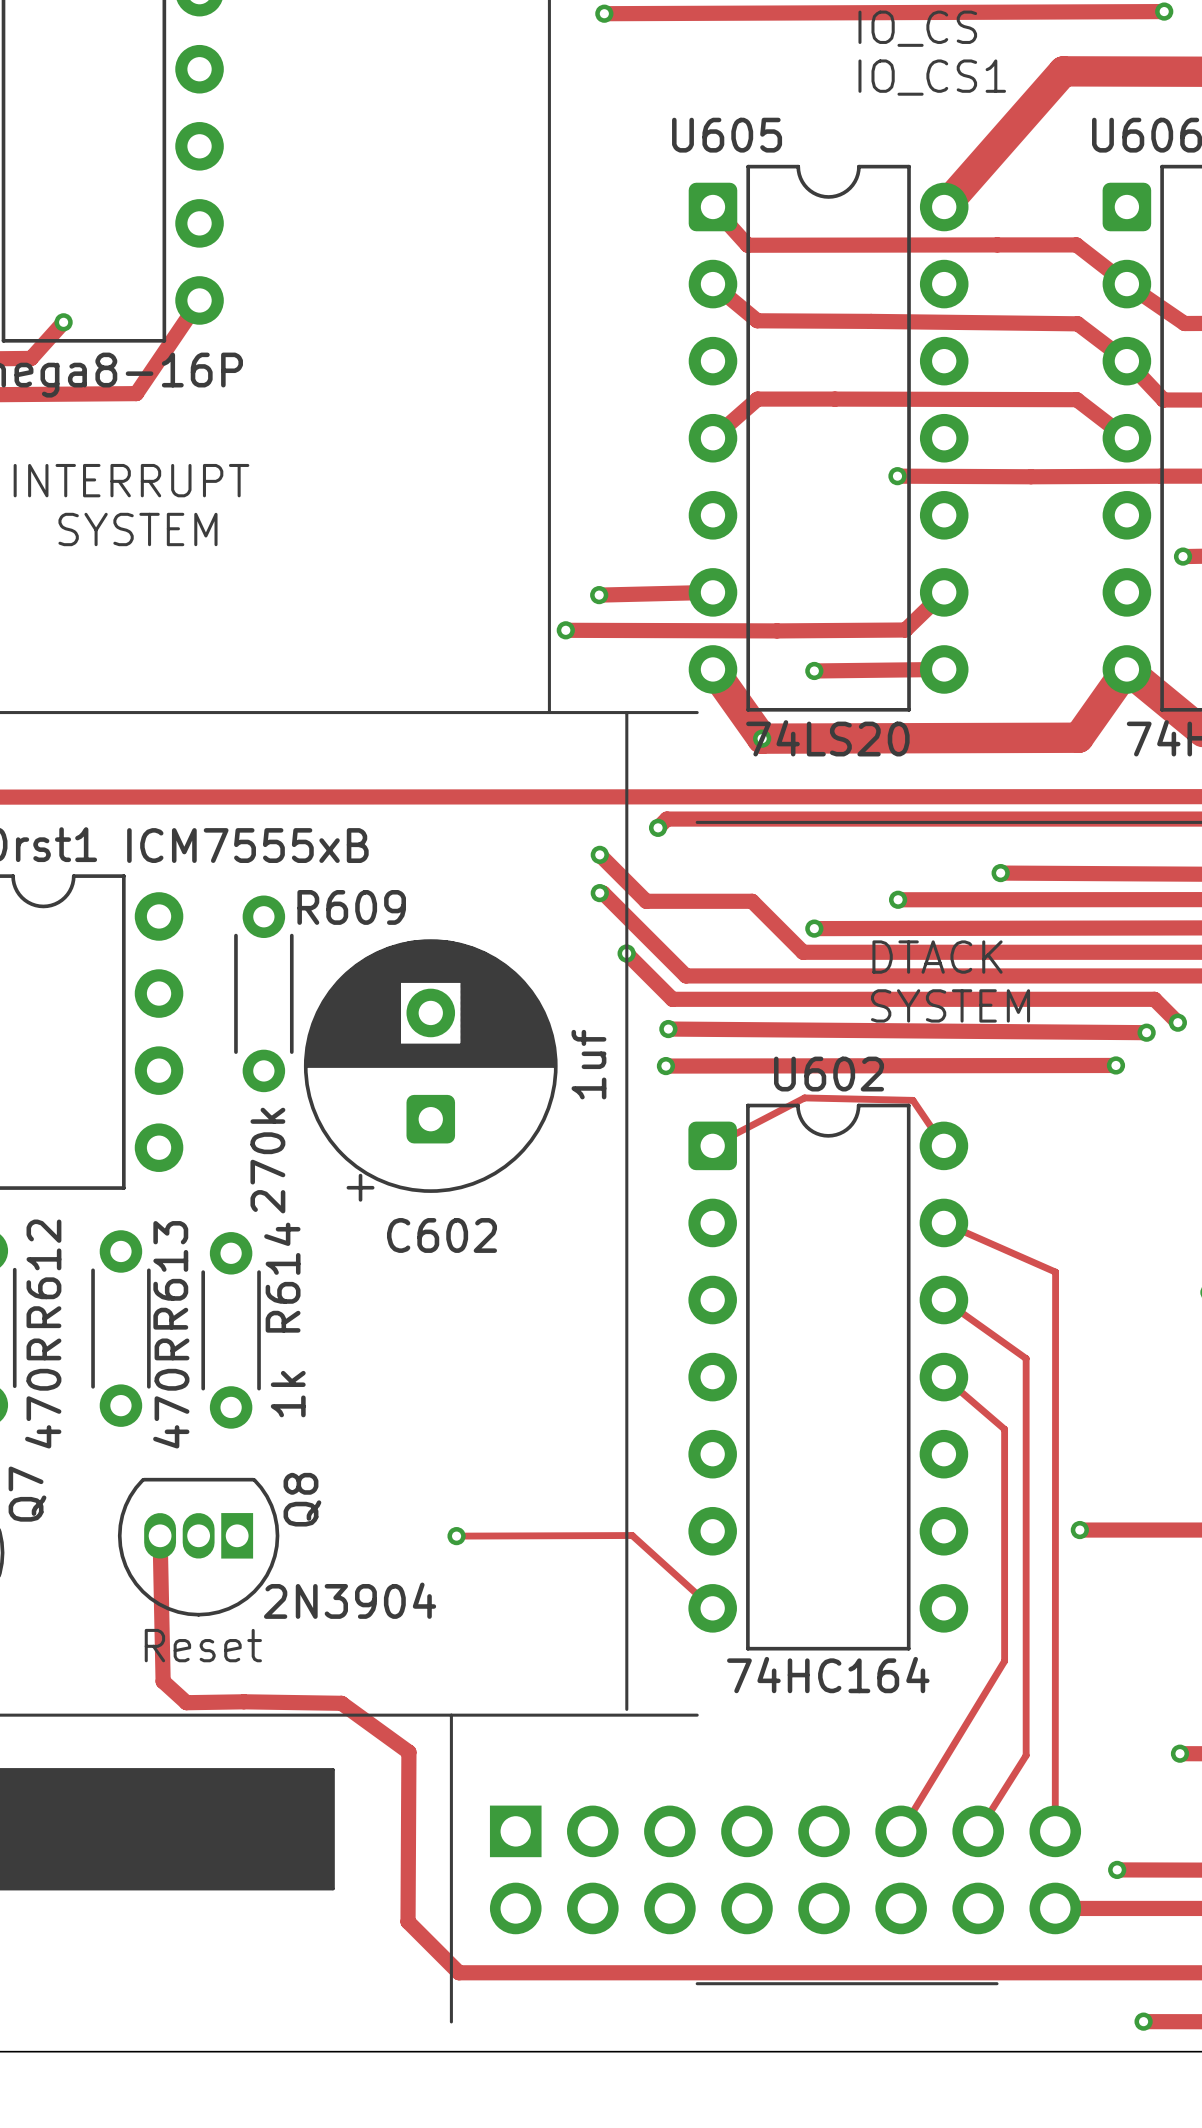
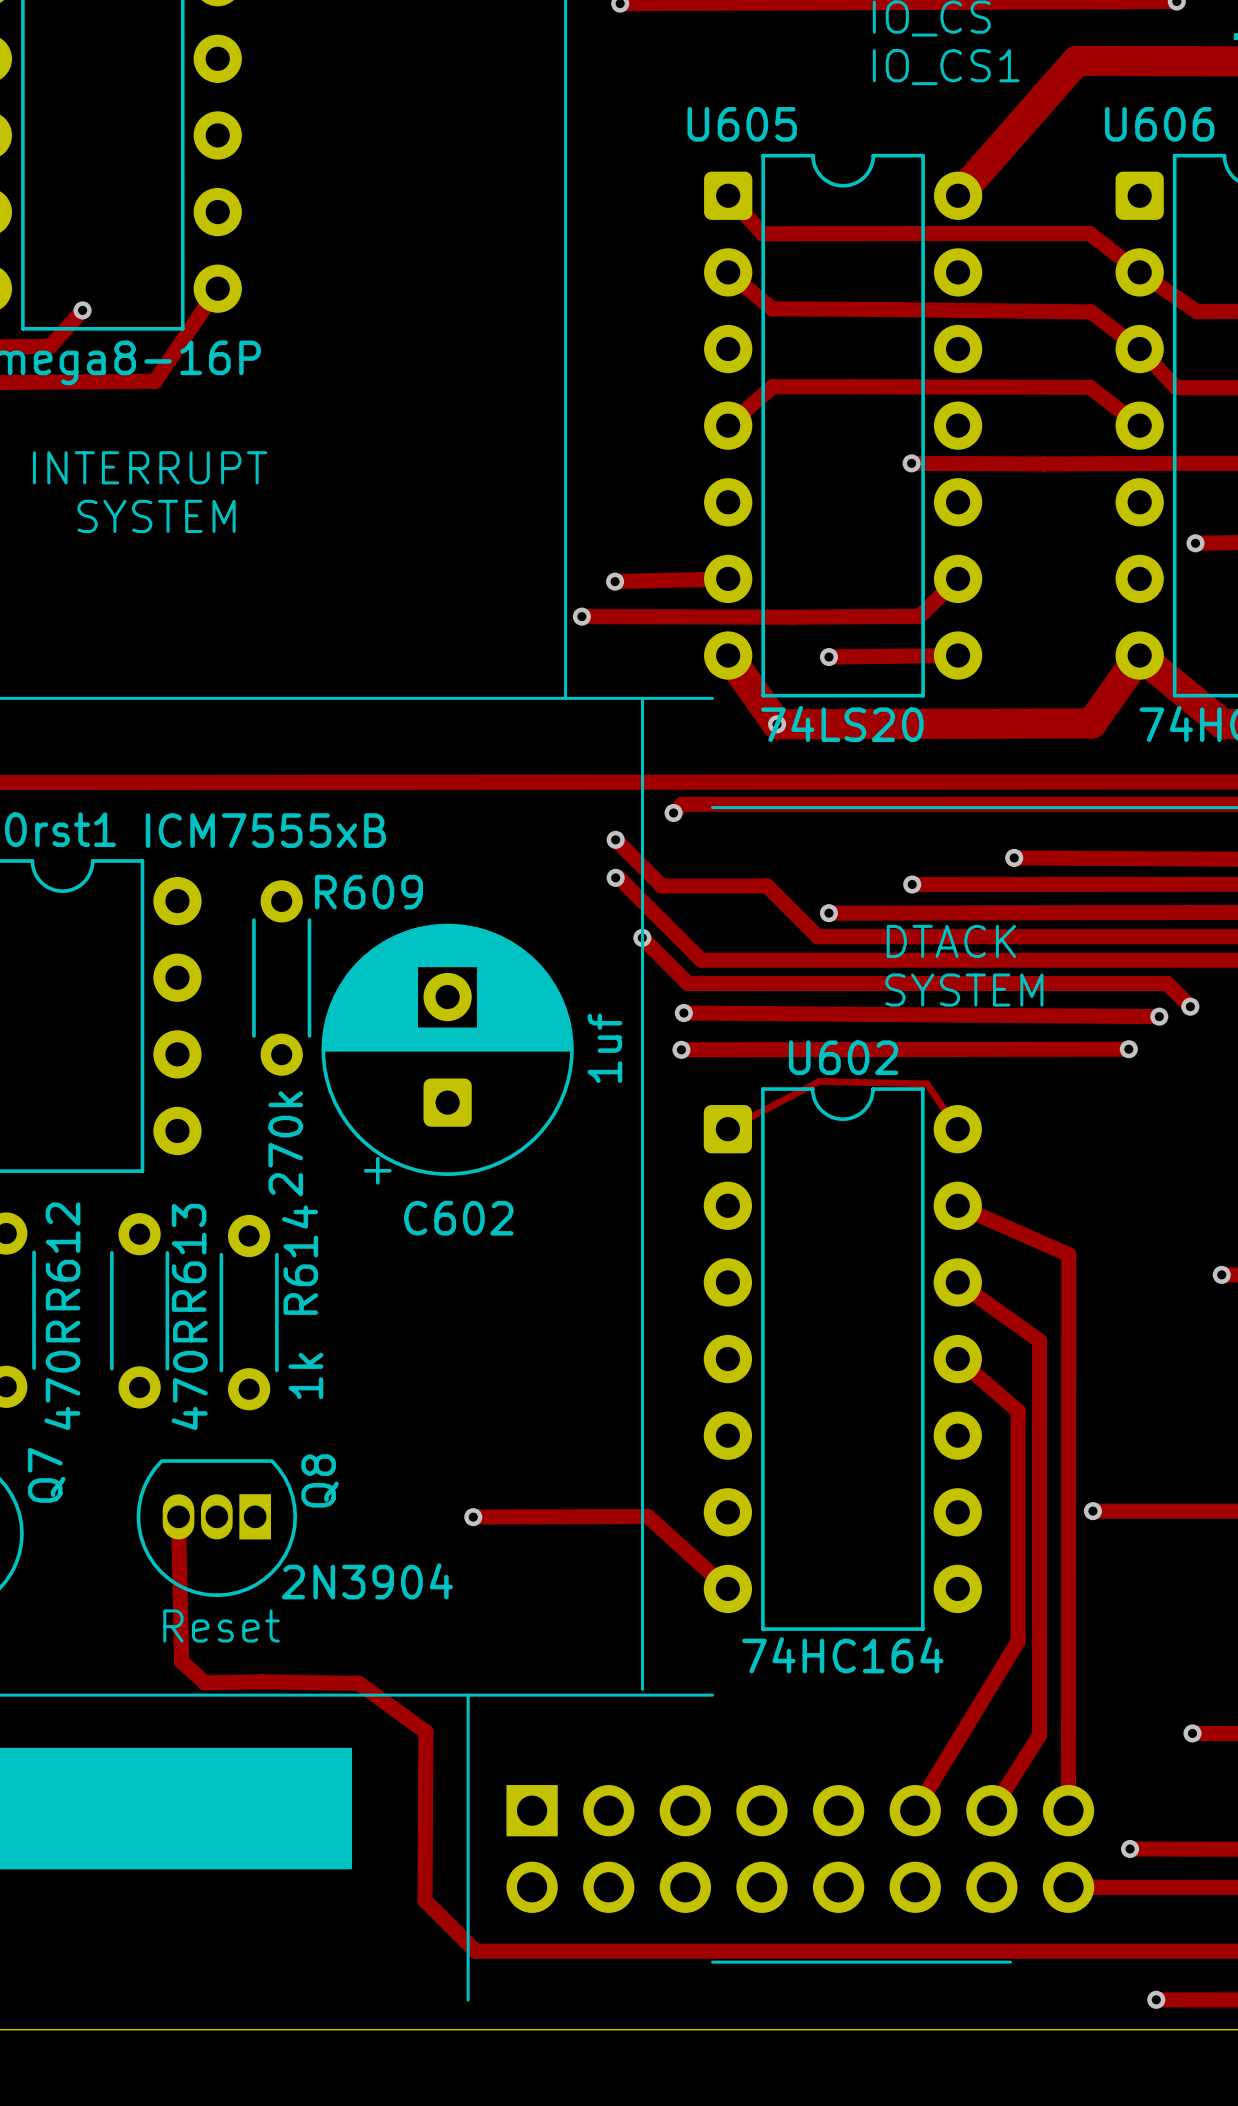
track width: thin (943, 1222) (1055, 1272) (1055, 1831) -> thick (957, 1205) (1068, 1254) (1068, 1810)
track width: thin (943, 1300) (1026, 1358) (1026, 1755) (978, 1831) -> thick (957, 1282) (1039, 1340) (1039, 1735) (991, 1810)
track width: thin (943, 1377) (1004, 1429) (1004, 1661) (901, 1831) -> thick (957, 1359) (1018, 1410) (1018, 1641) (915, 1810)
track width: thin (456, 1536) (632, 1535) (712, 1608) -> thick (473, 1517) (647, 1516) (727, 1588)

